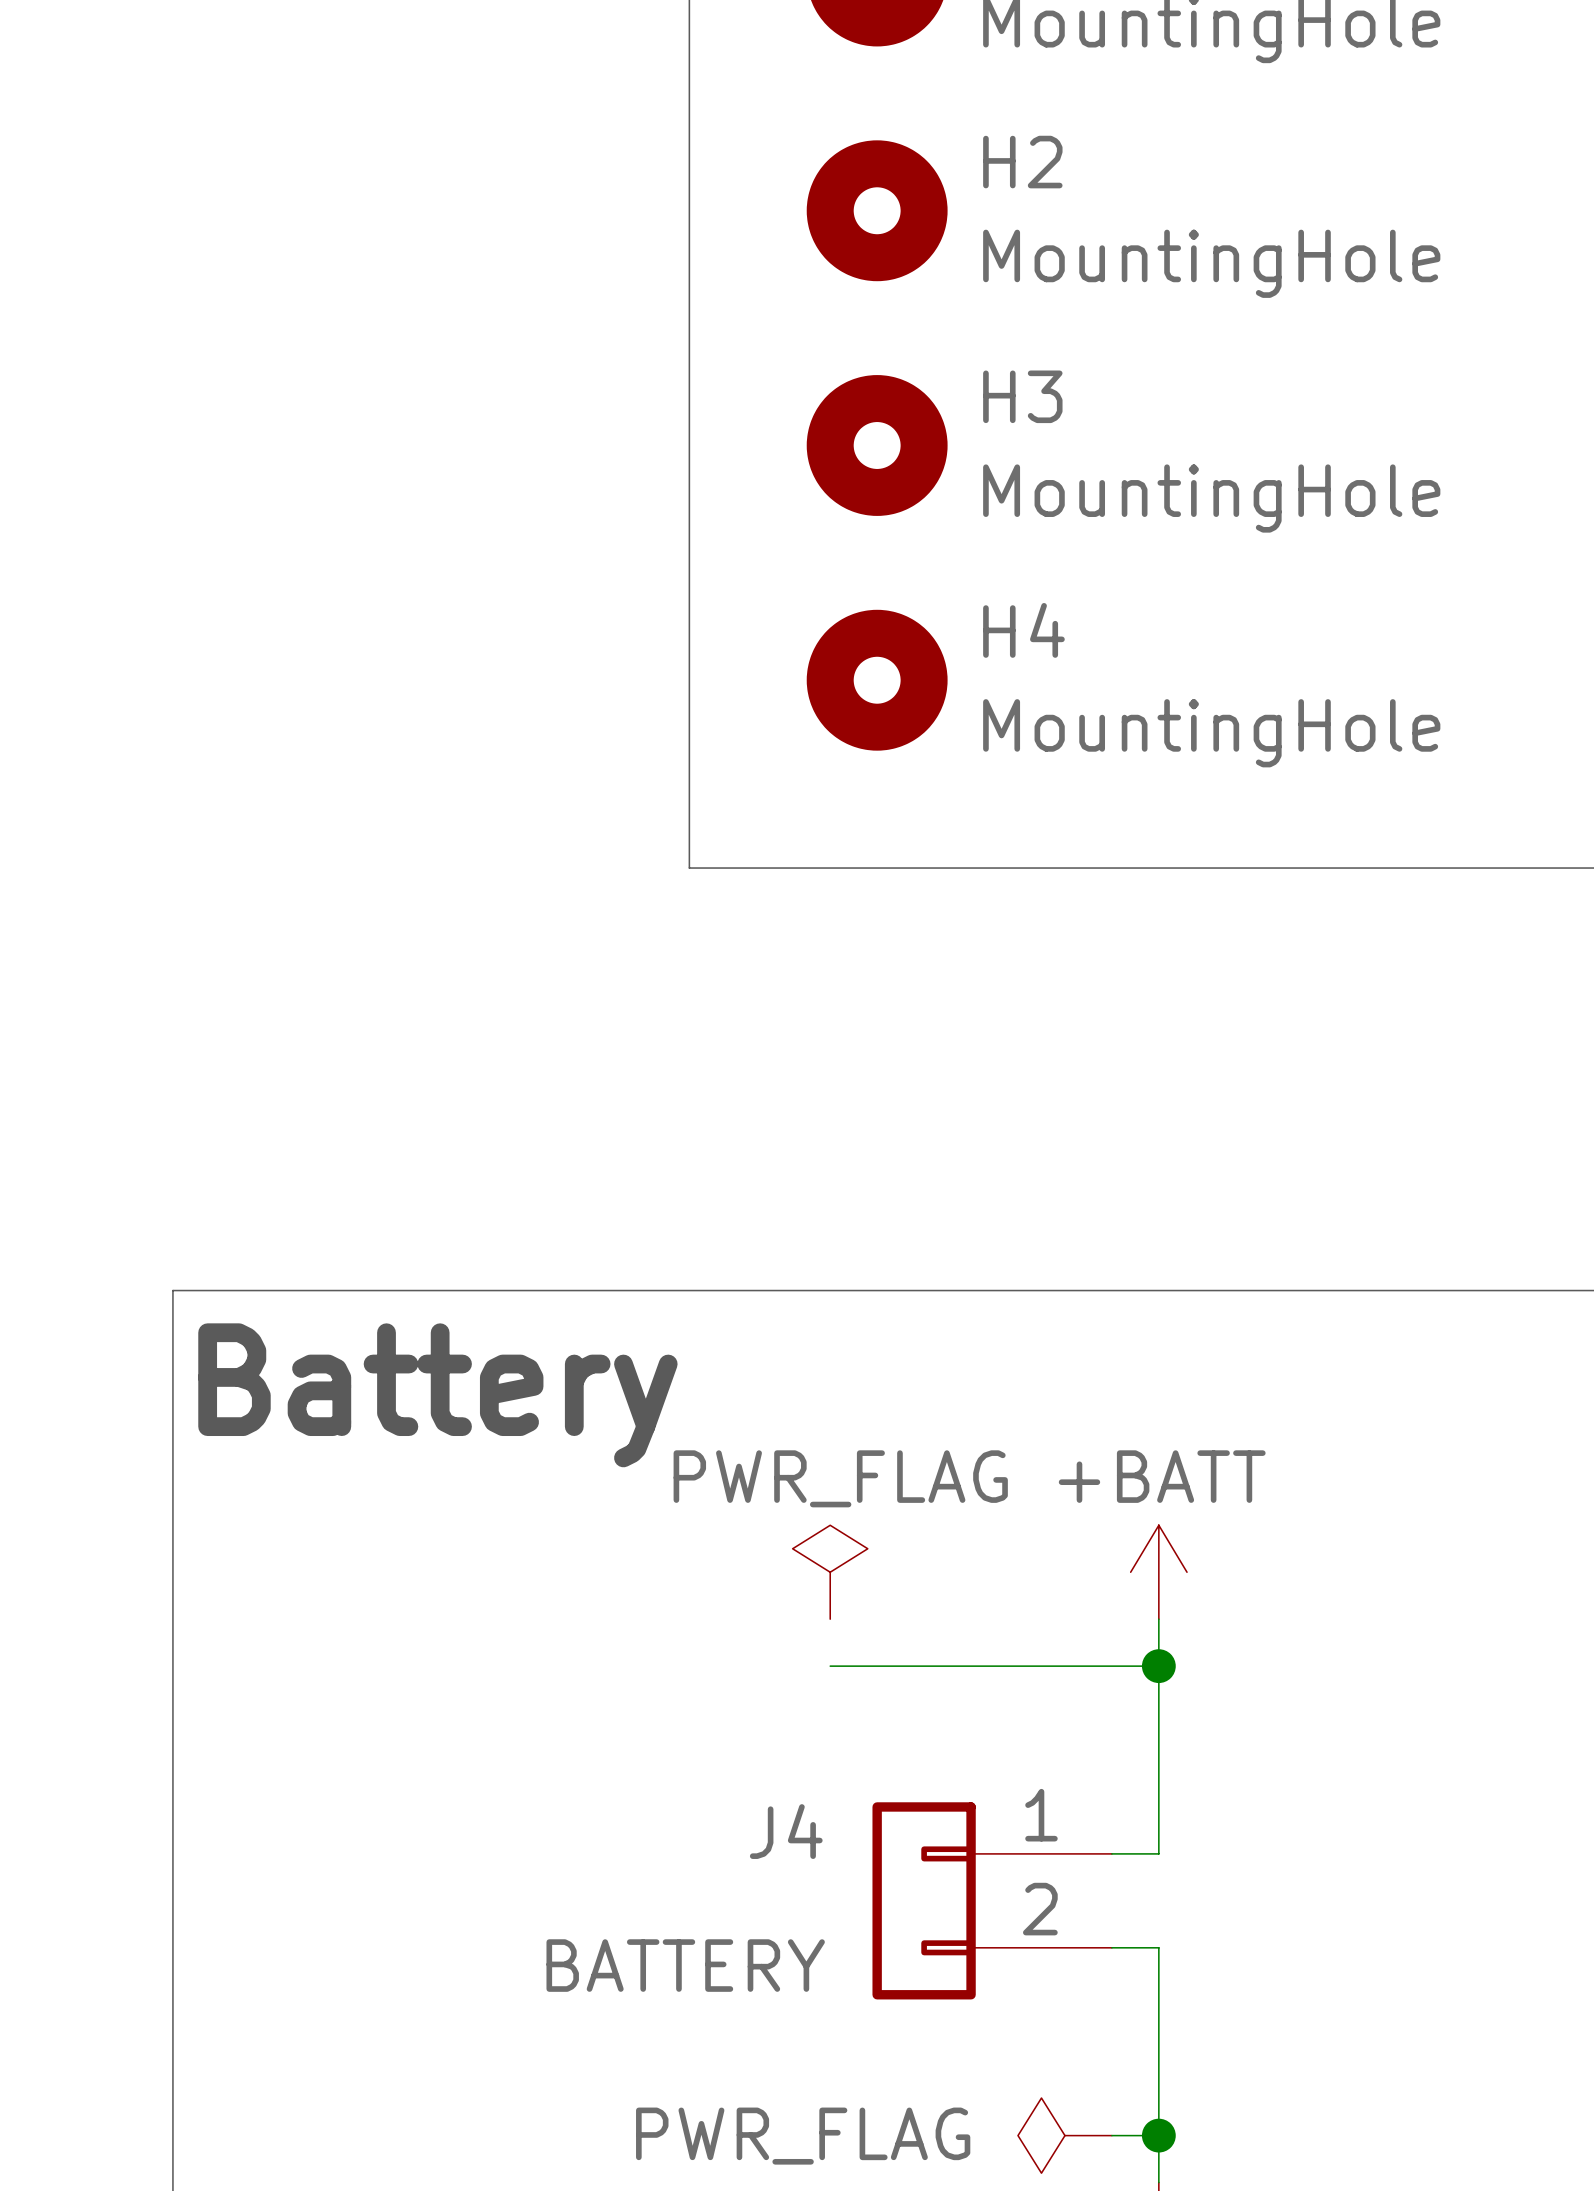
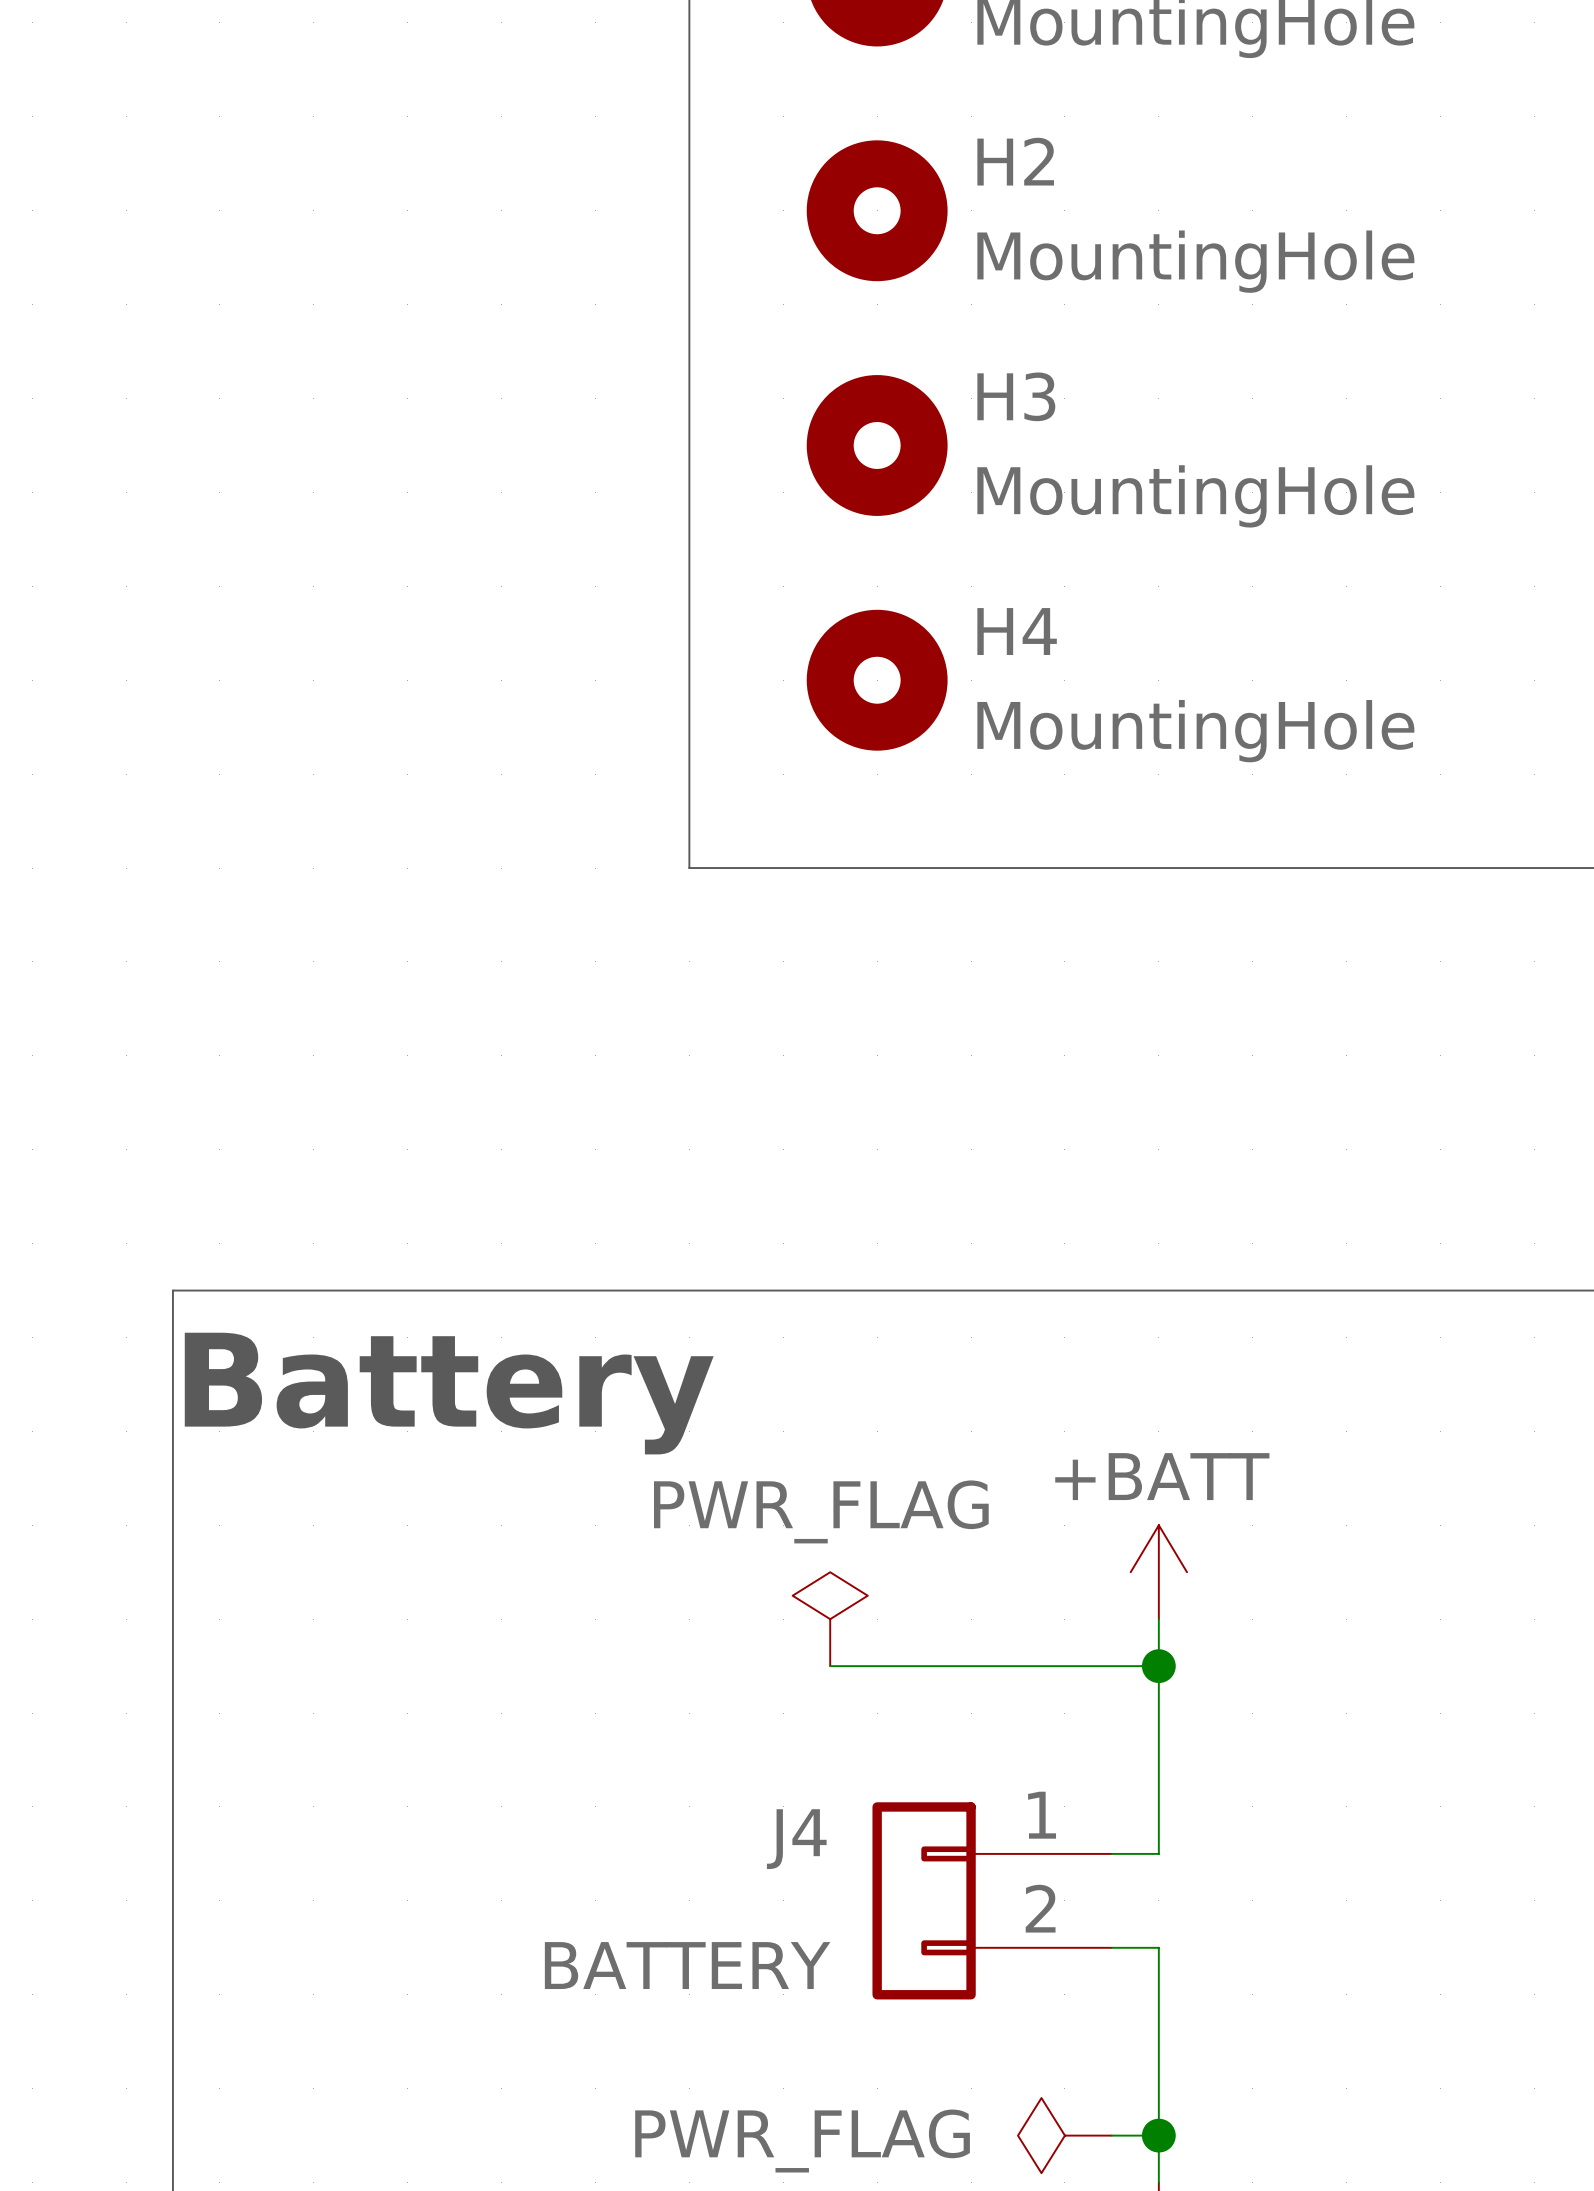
power symbol text position: PWR_FLAG (840, 1478) -> PWR_FLAG (821, 1511)
power symbol position: PWR_FLAG (830, 1572) -> PWR_FLAG (830, 1619)

